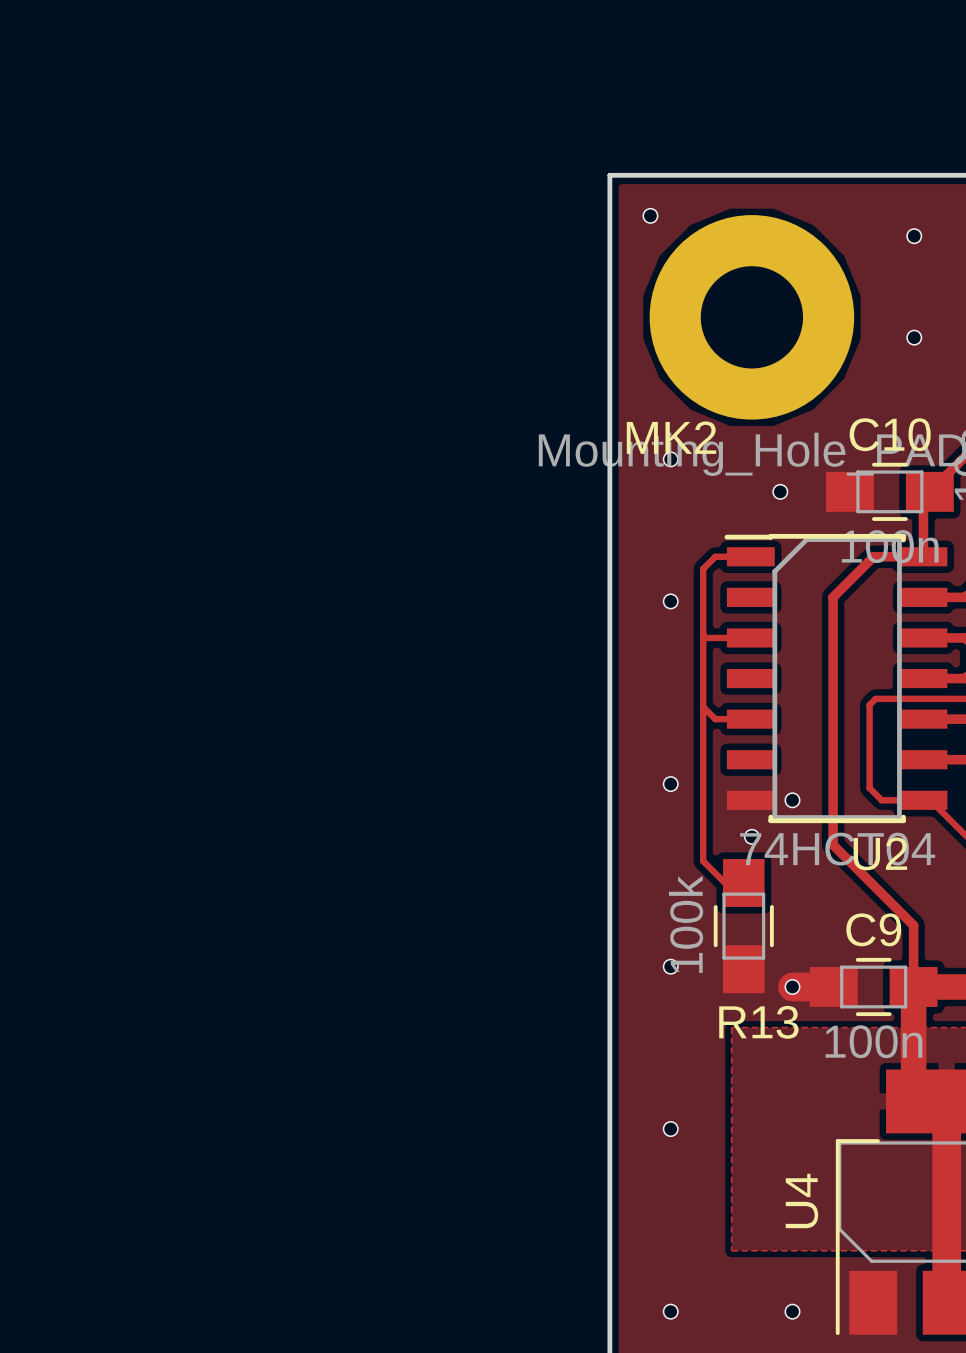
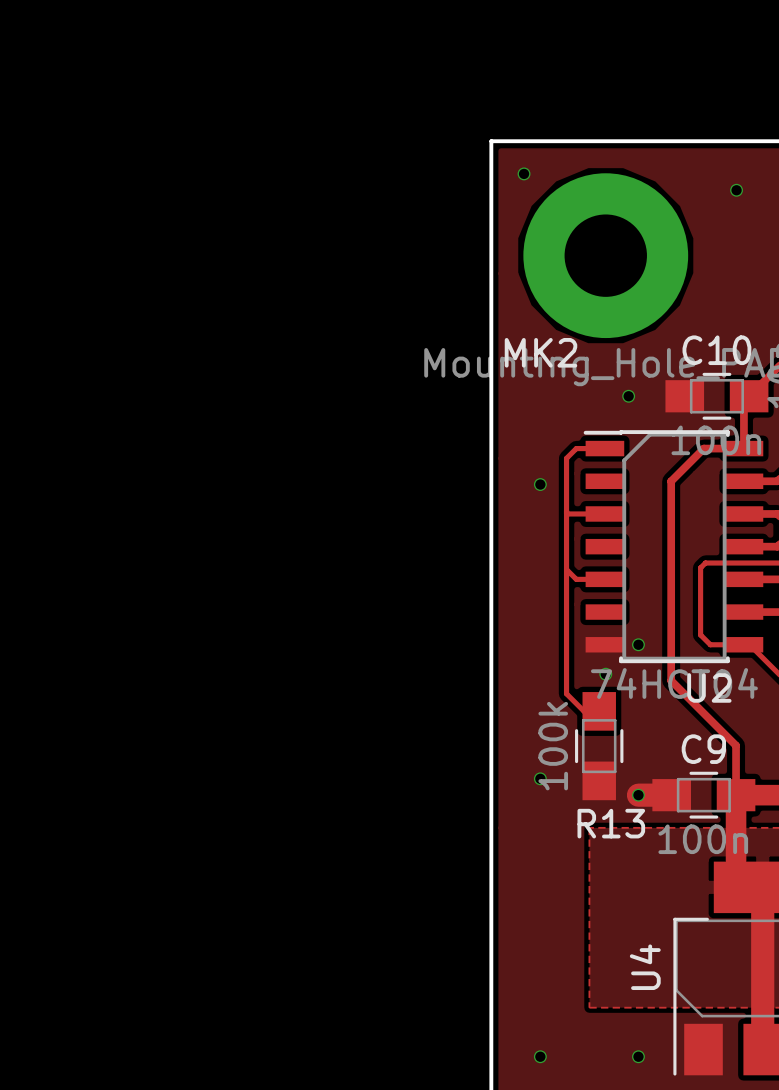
via: (914, 337) -> none
via: (670, 459) -> none
via: (670, 784) -> none
via: (670, 1129) -> none

